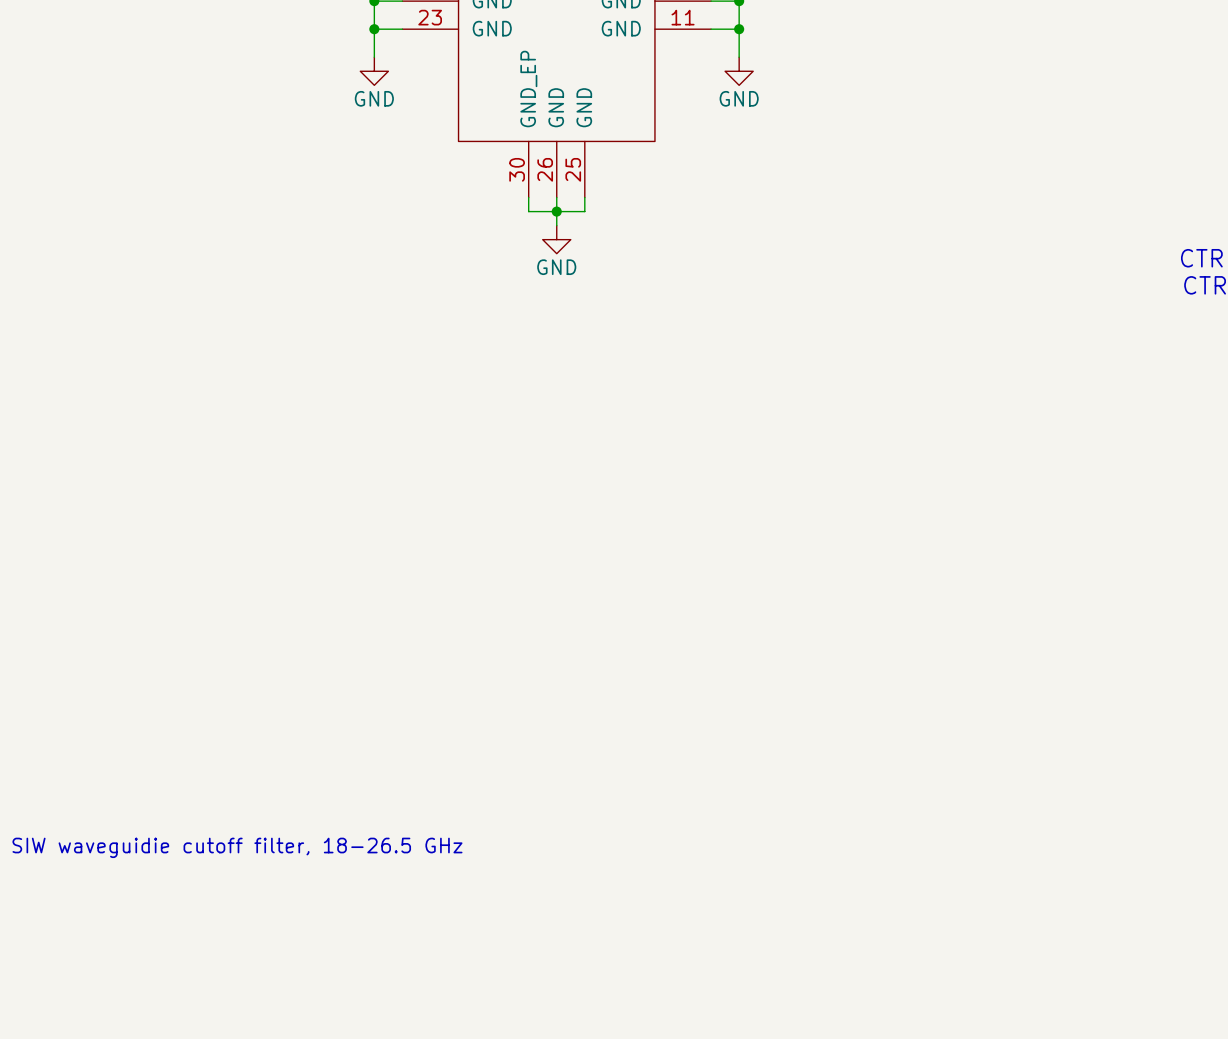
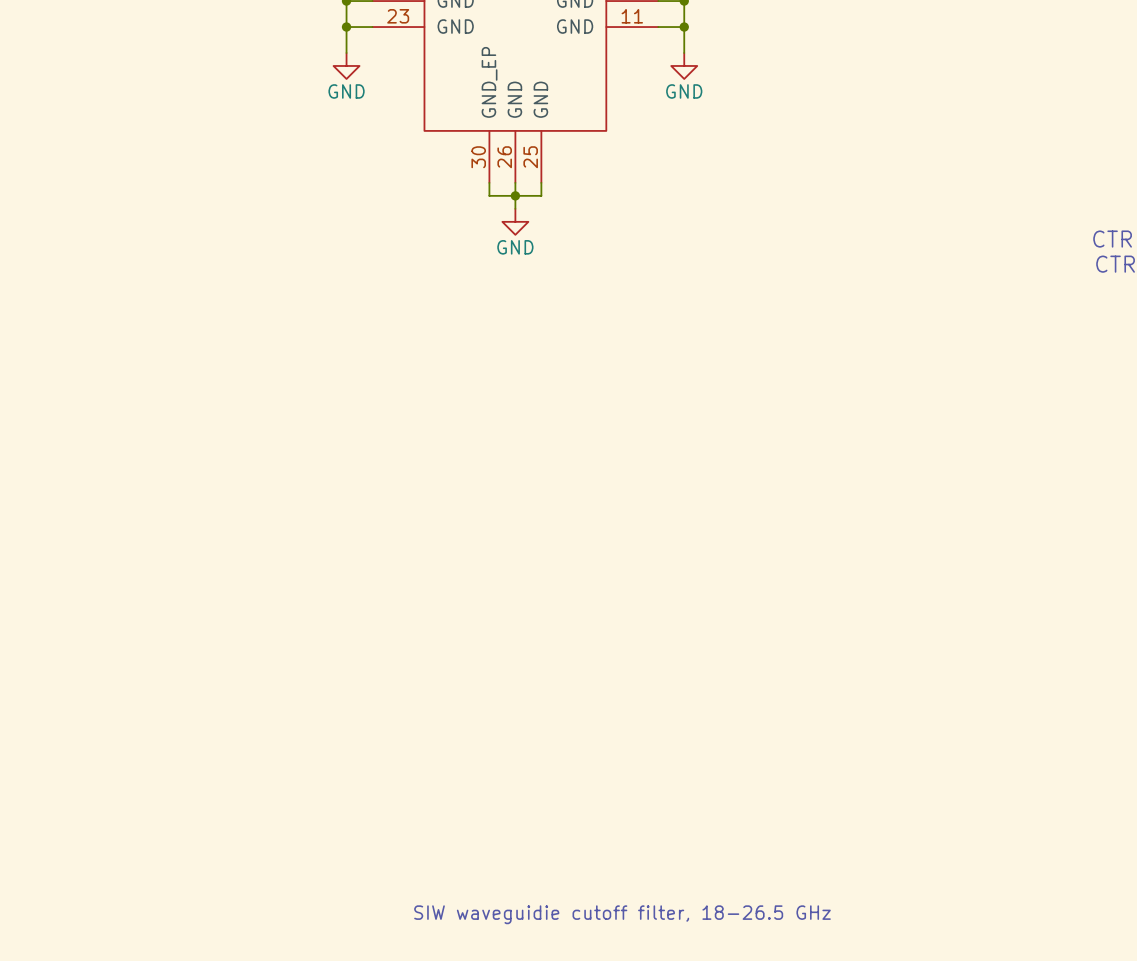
text: SIW waveguidie cutoff filter, 18-26.5 GHz (237, 847) -> none
text: none -> SIW waveguidie cutoff filter, 18-26.5 GHz (622, 914)

